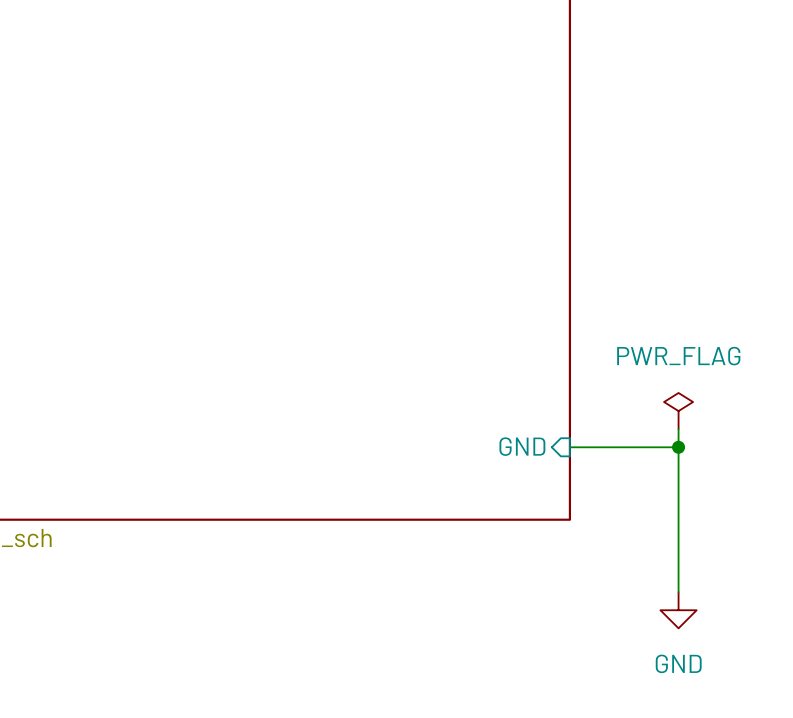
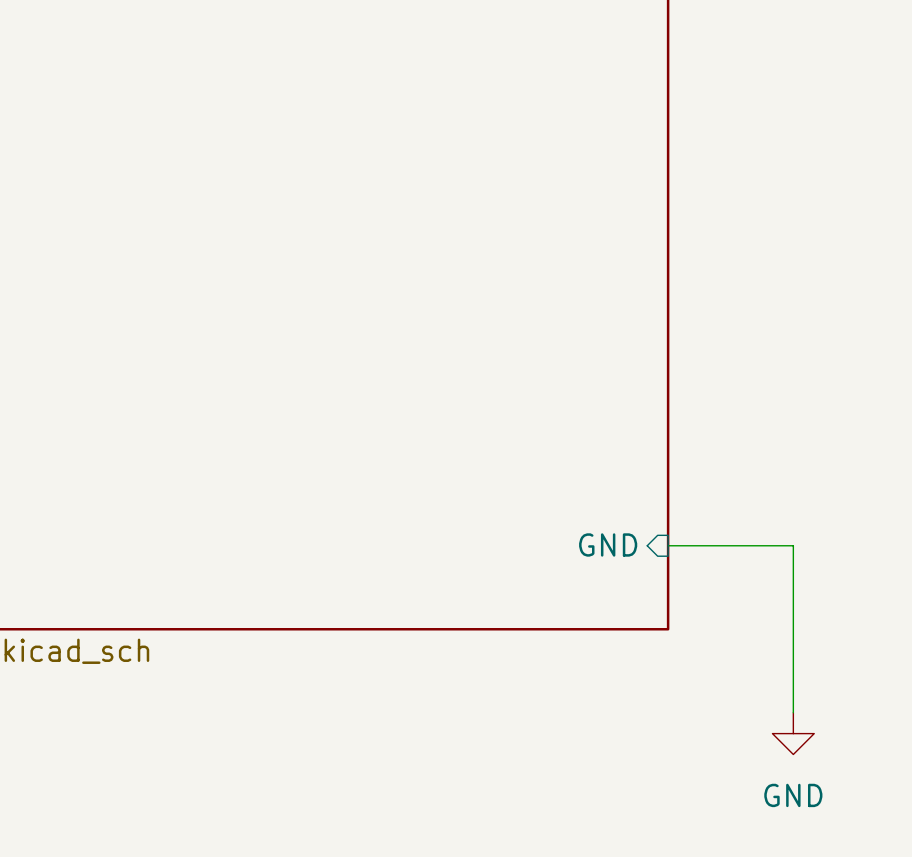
power symbol: PWR_FLAG (678, 411) -> none
wire: (678, 429) (678, 447) -> none
junction: (678, 447) -> none

